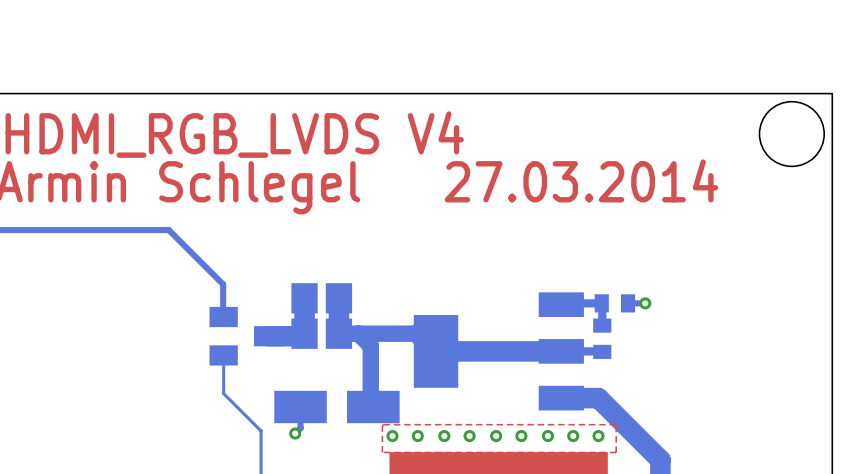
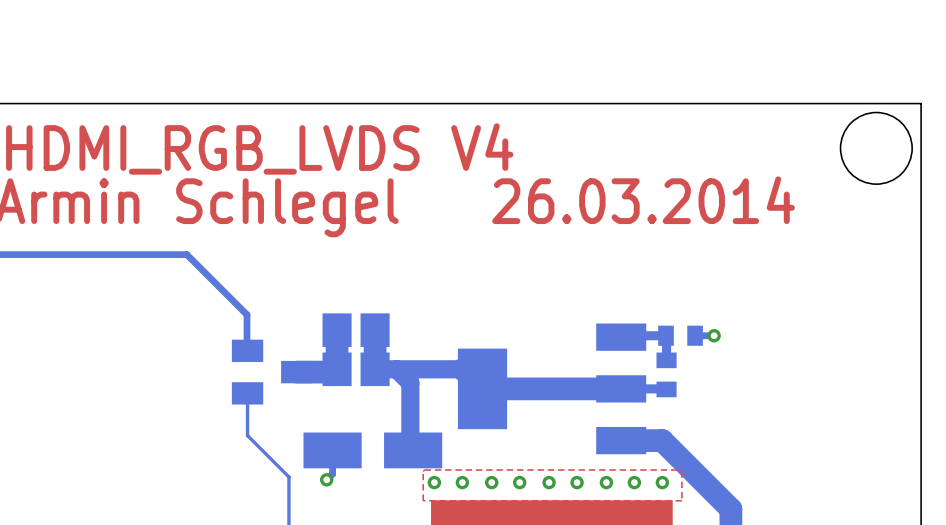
text: 27.03.2014 (581, 180) -> 26.03.2014 (643, 200)

